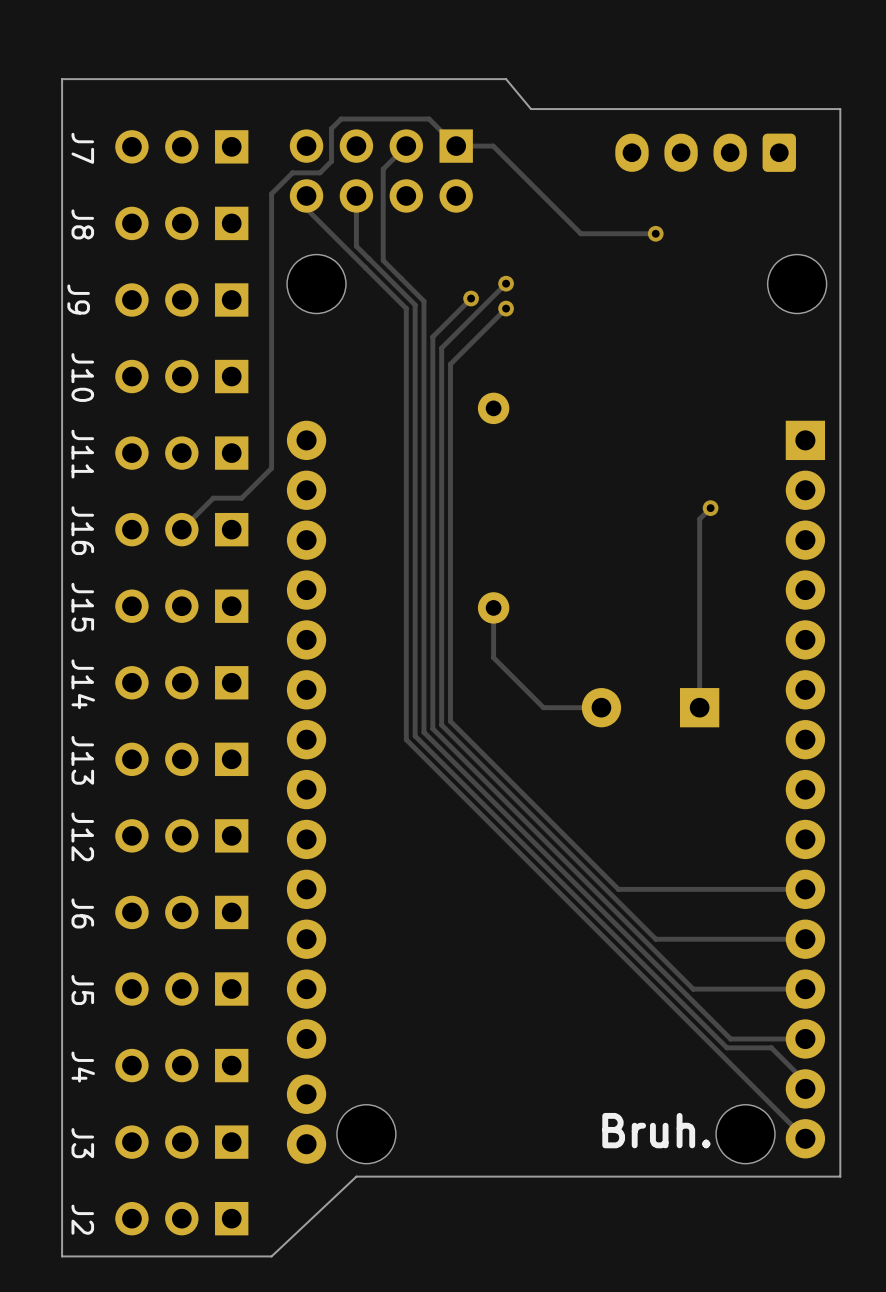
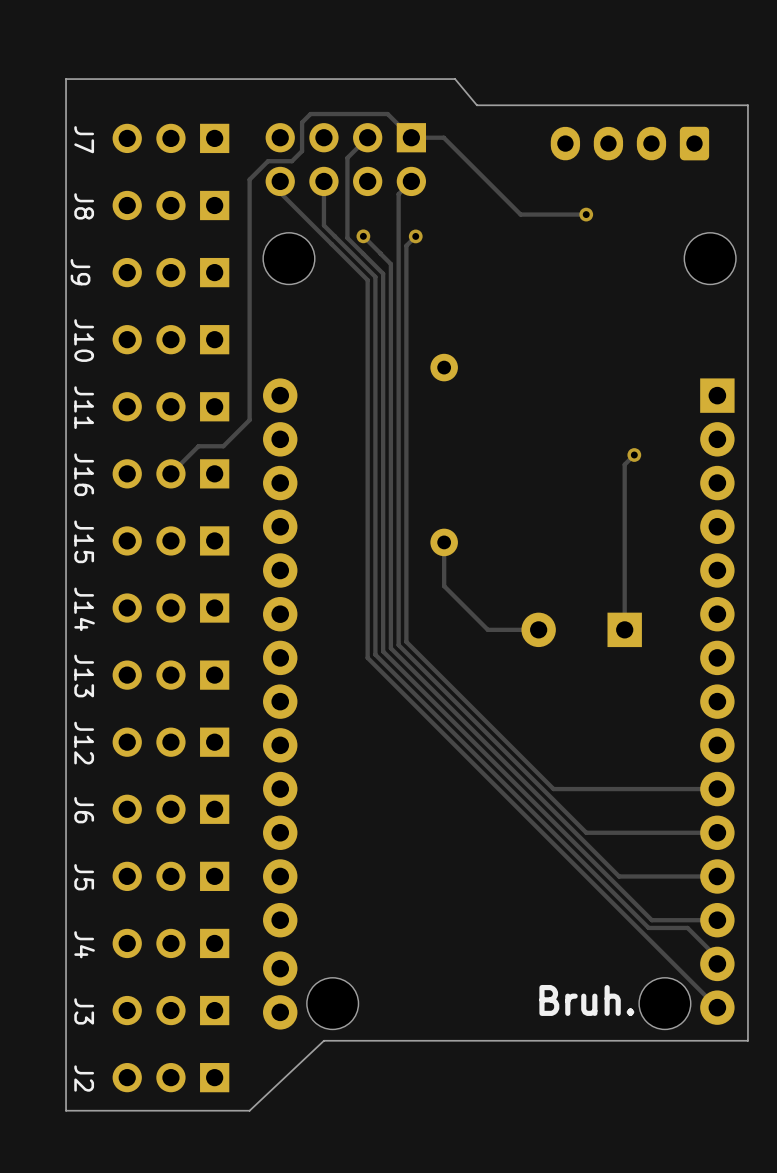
track: none -> (363, 236) (380, 253)
via: none -> (363, 236)
via: none -> (415, 236)
track: (506, 283) (441, 348) -> (411, 181) (398, 194) (398, 314)
via: (506, 283) -> none
track: (471, 298) (432, 336) -> (380, 253) (390, 264) (390, 304)
via: (471, 298) -> none
track: (506, 308) (450, 364) -> (415, 236) (406, 245) (406, 328)
via: (506, 308) -> none

